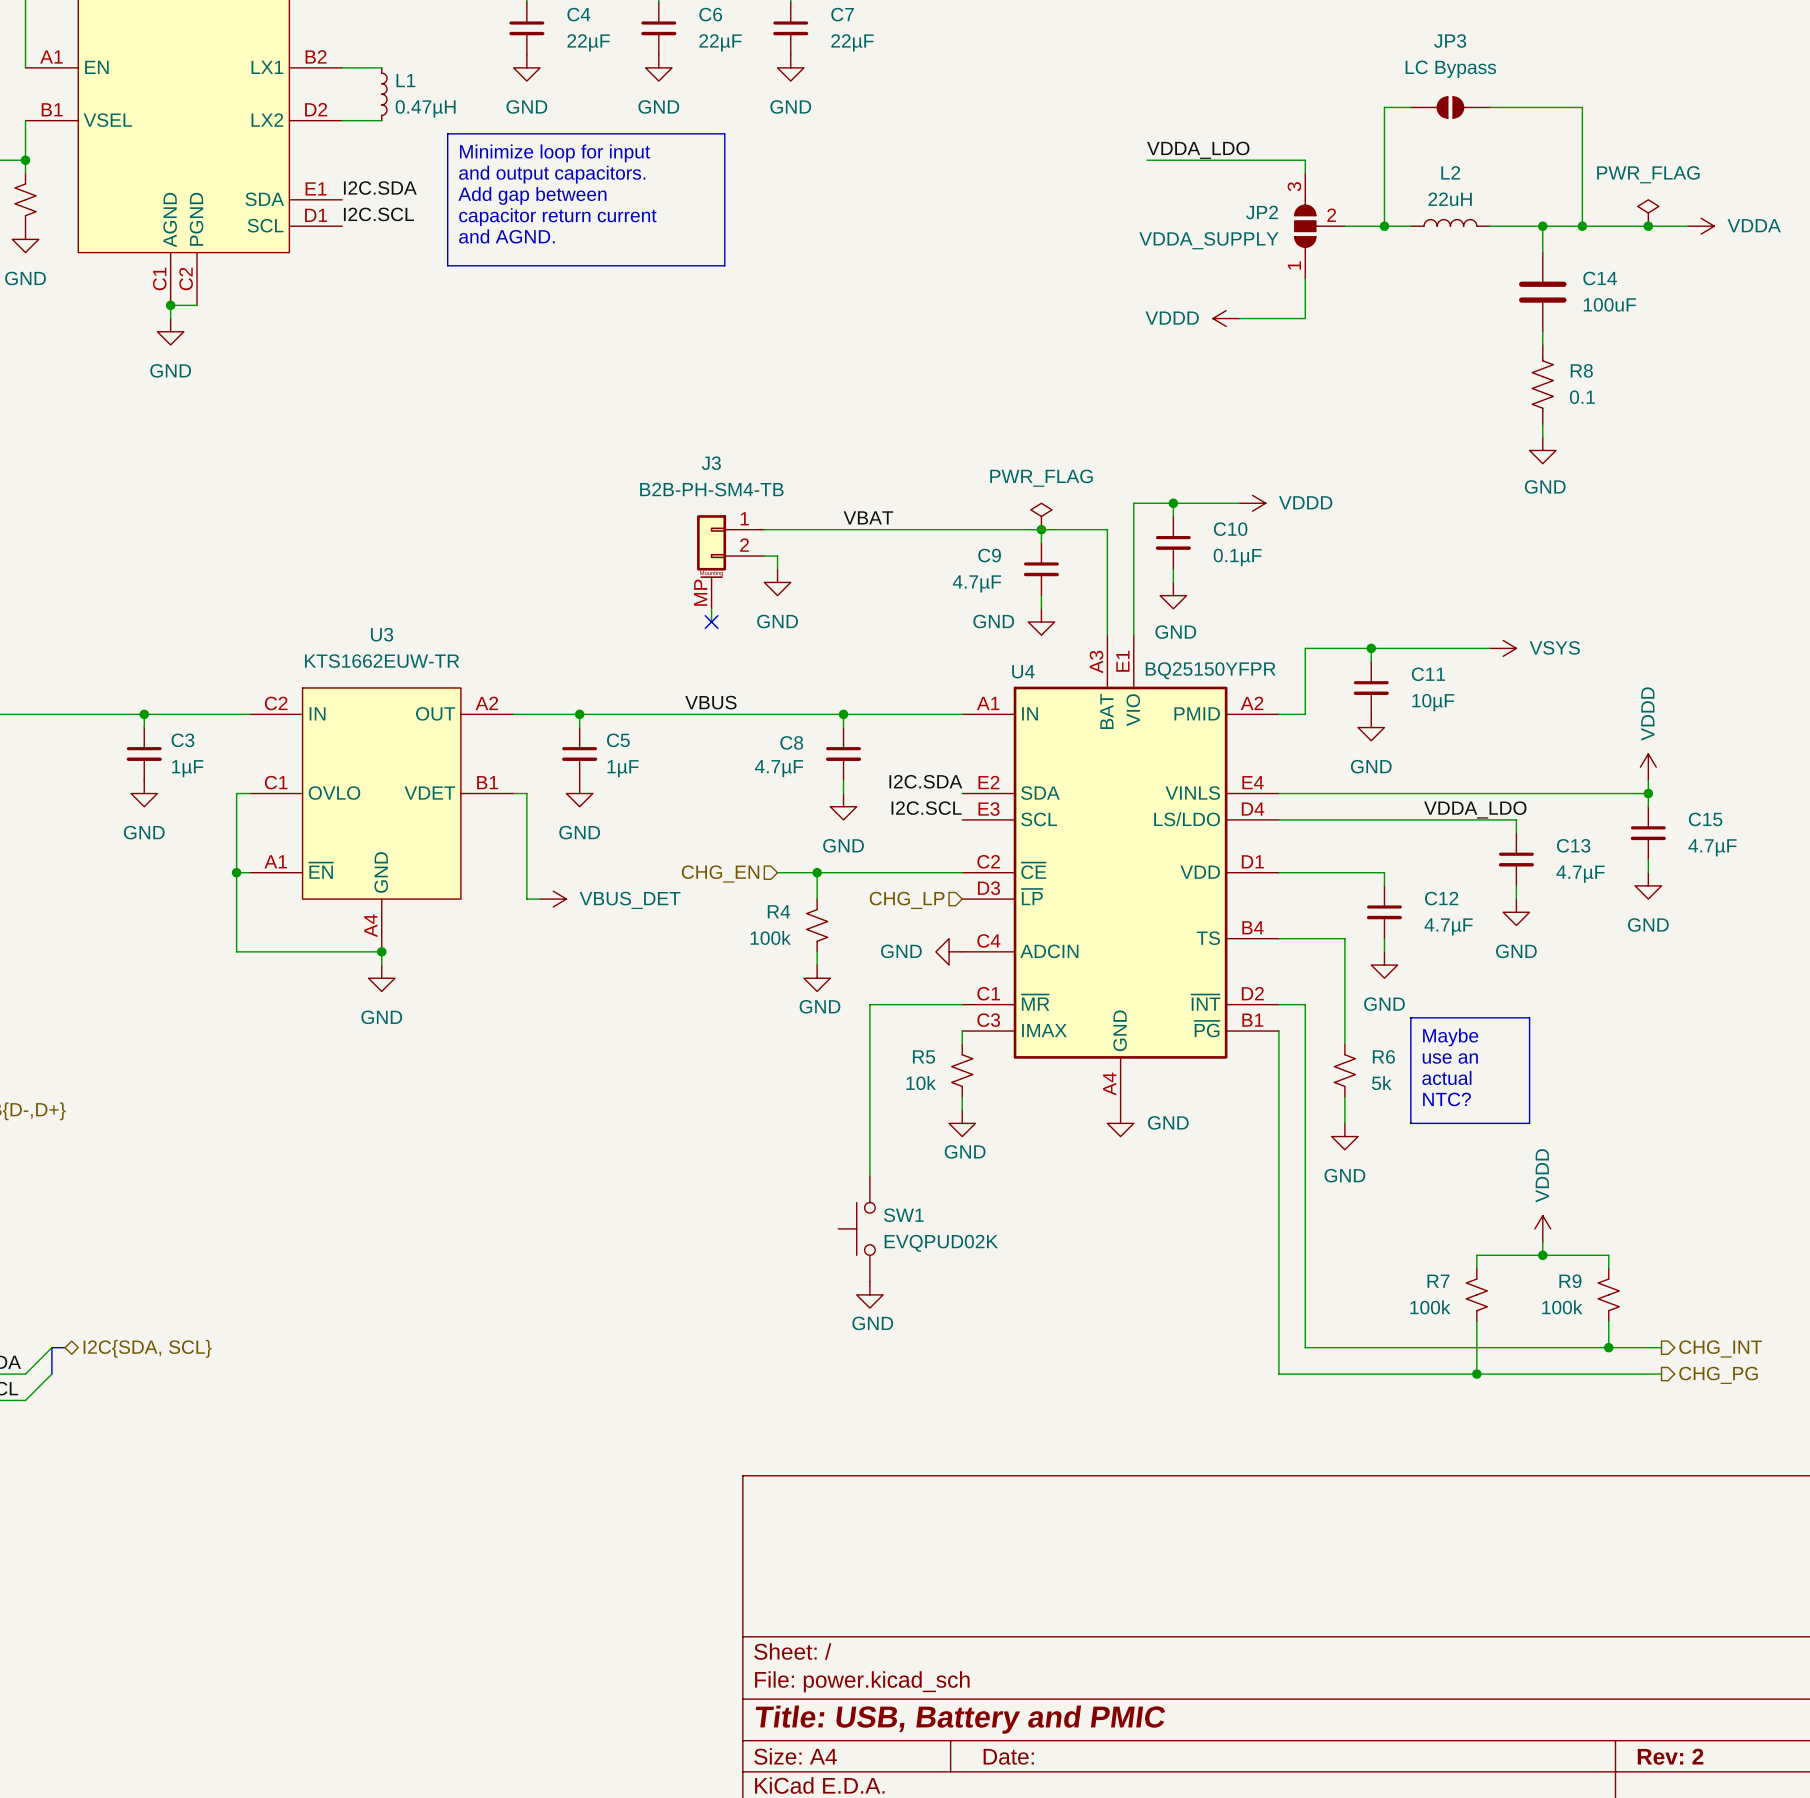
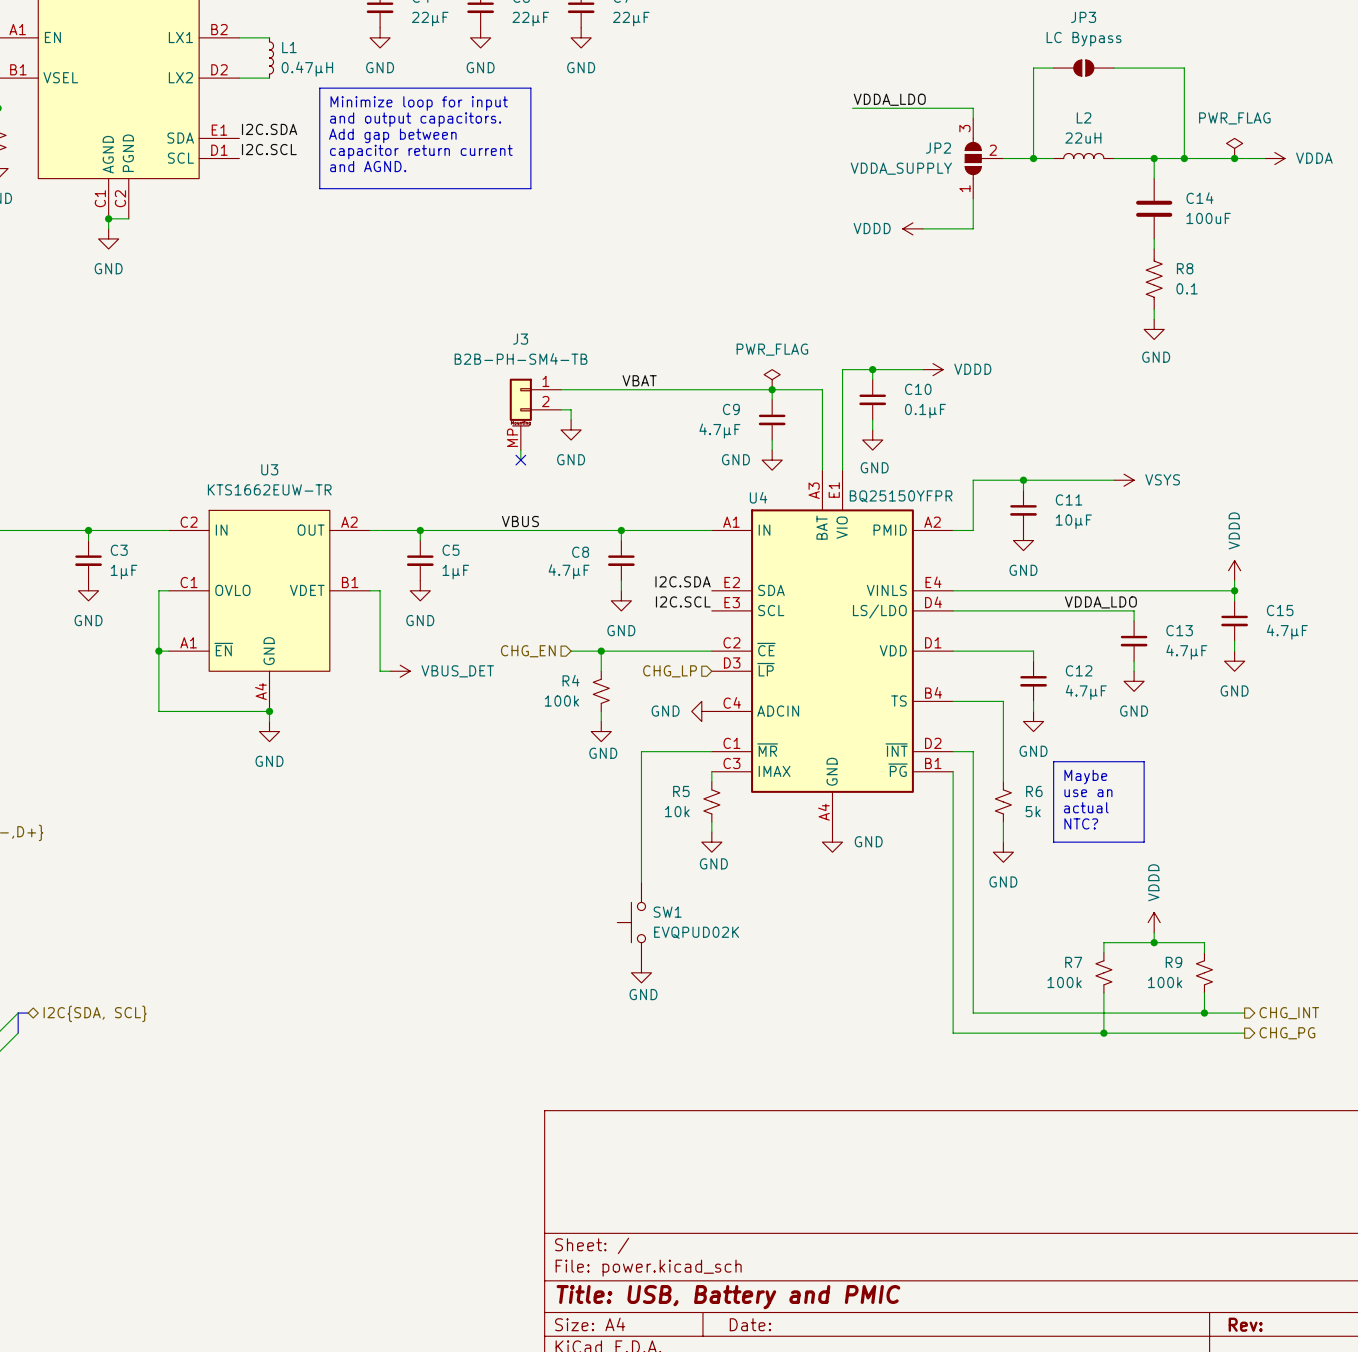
title block: Rev: 2 (1670, 1756) -> Rev: (1245, 1324)

